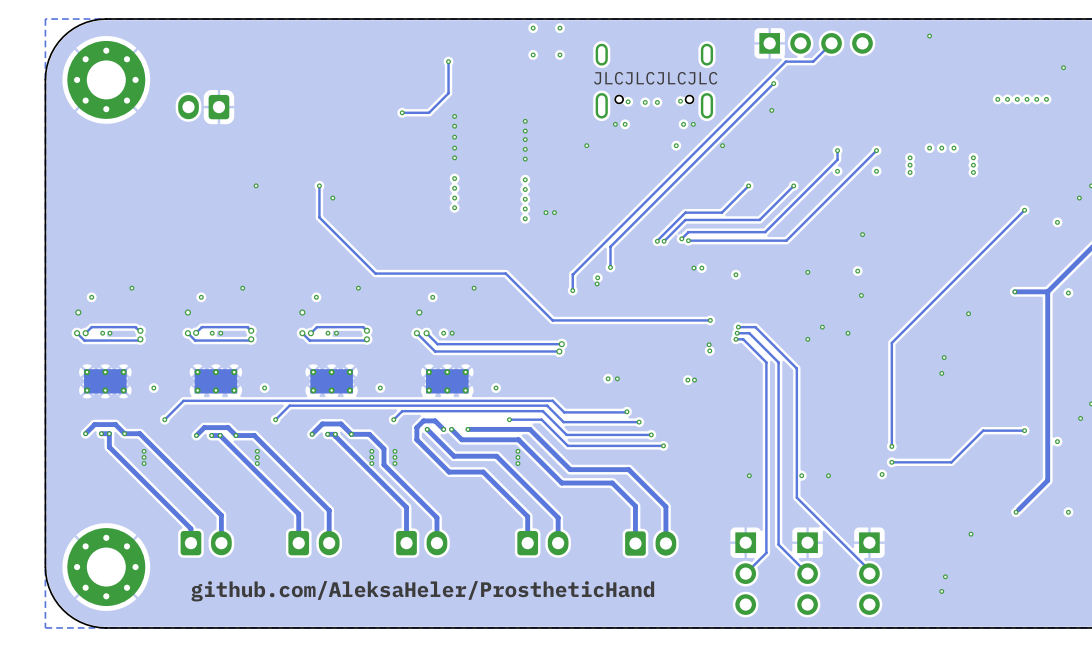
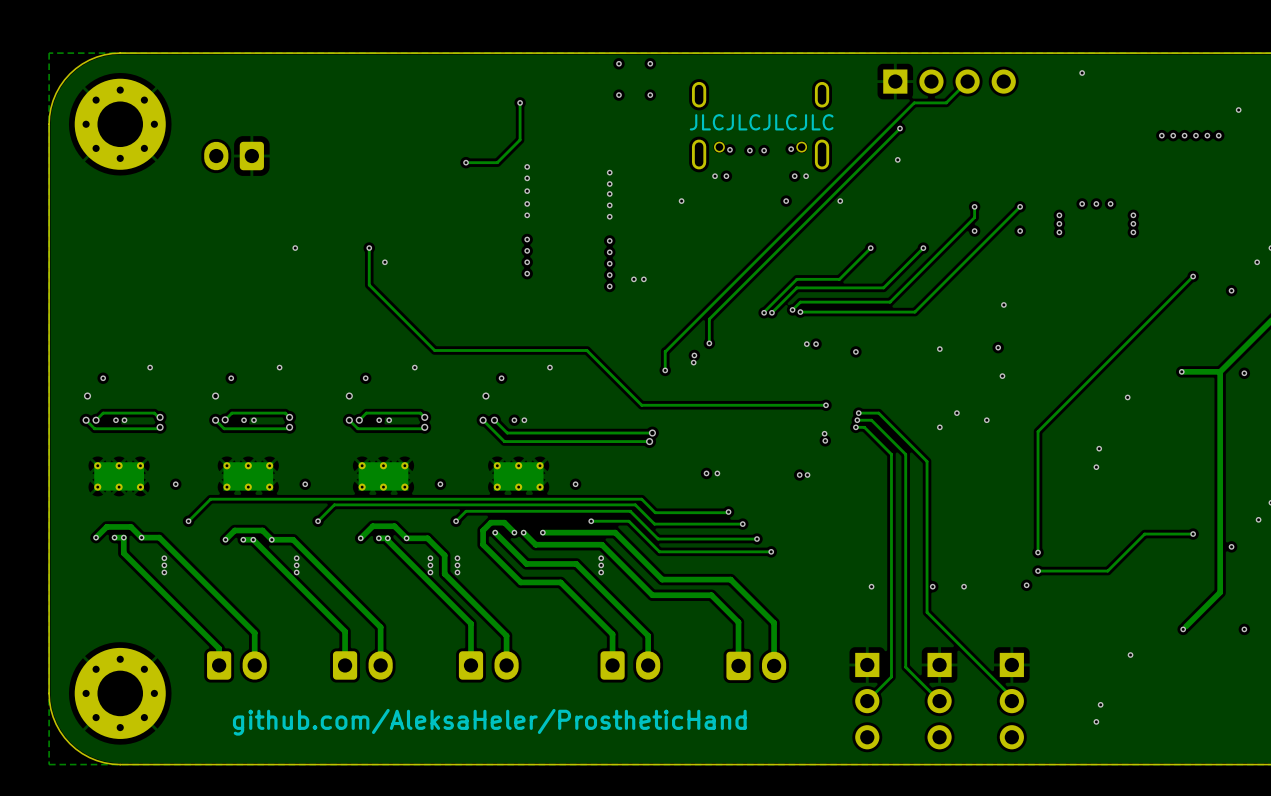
via: none -> (1161, 135)
via: none -> (1173, 135)
via: none -> (1184, 135)
via: none -> (1195, 135)
via: none -> (1207, 135)
via: none -> (1218, 135)
via: (997, 99) -> none
via: (1007, 99) -> none
via: (1017, 99) -> none
via: (1027, 99) -> none
via: (1036, 99) -> none
via: (1046, 99) -> none

